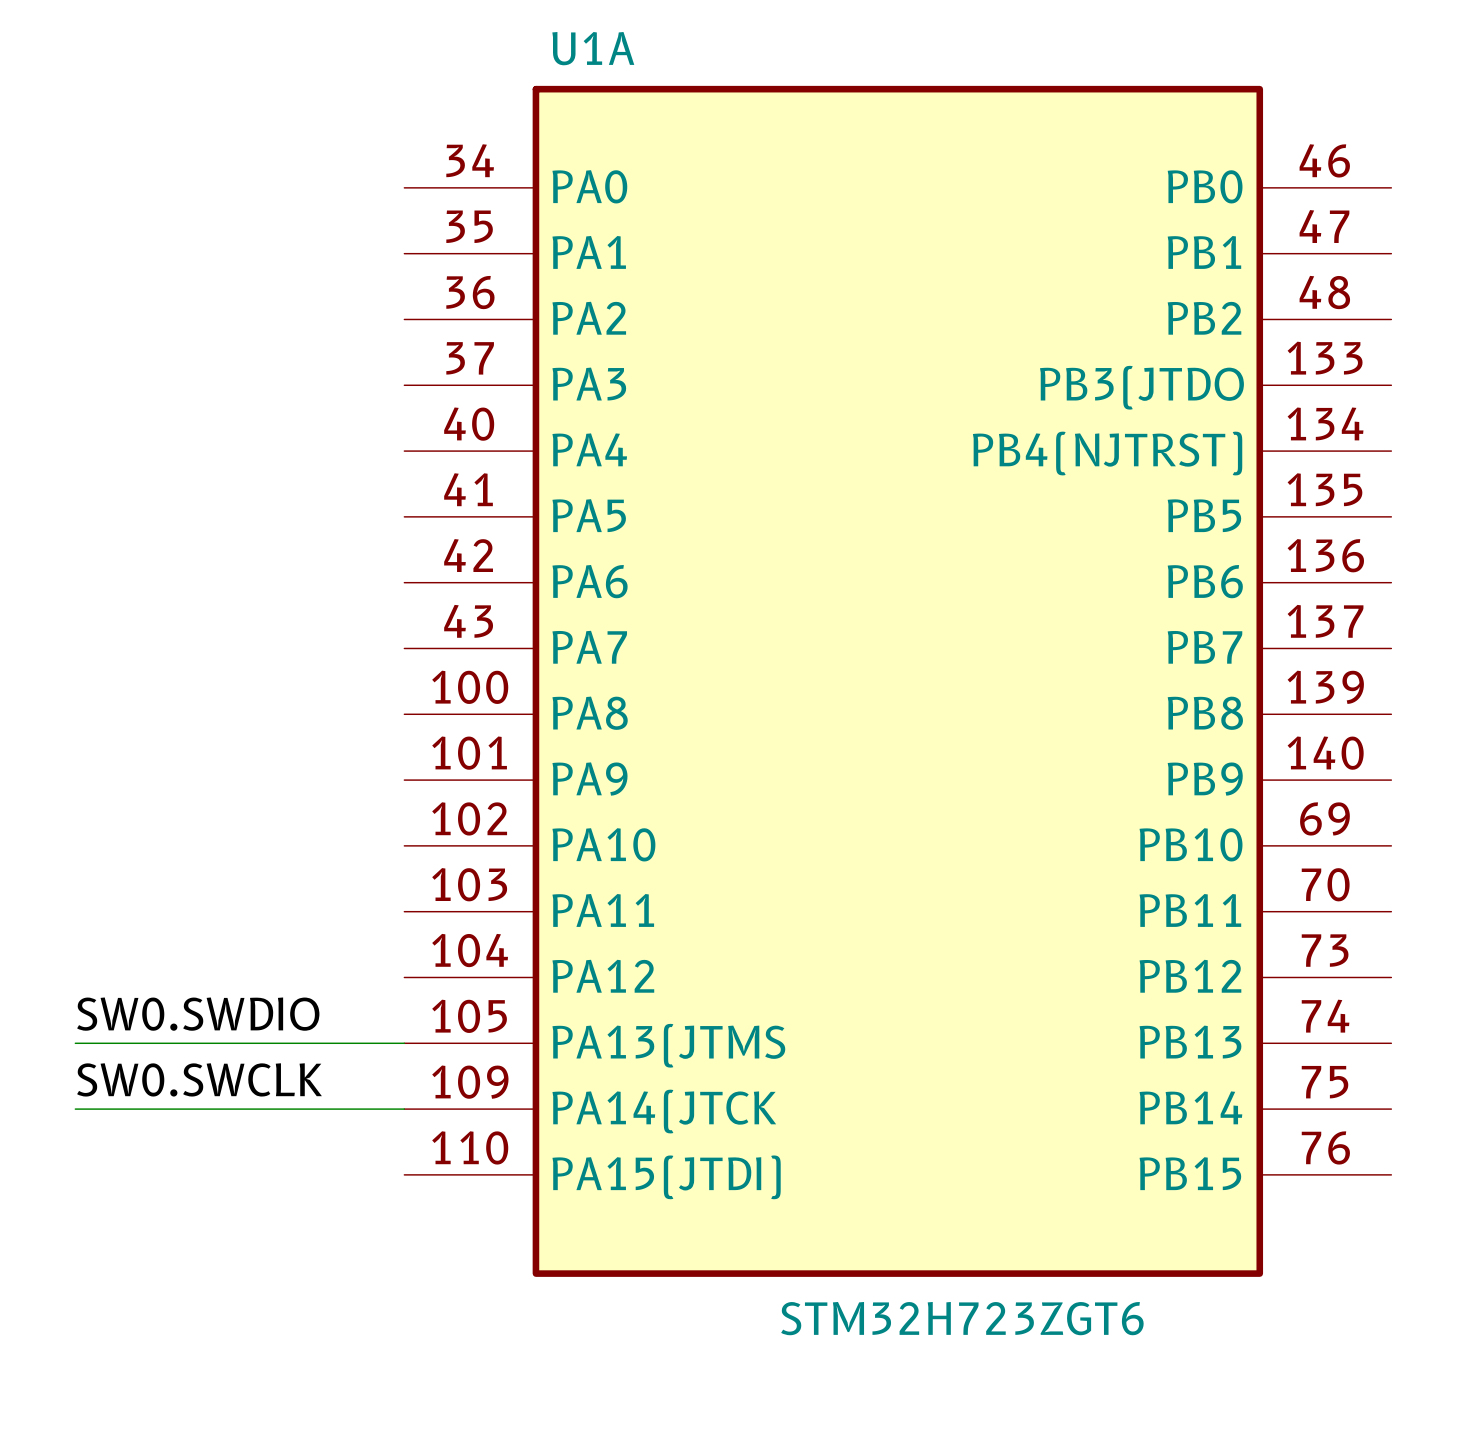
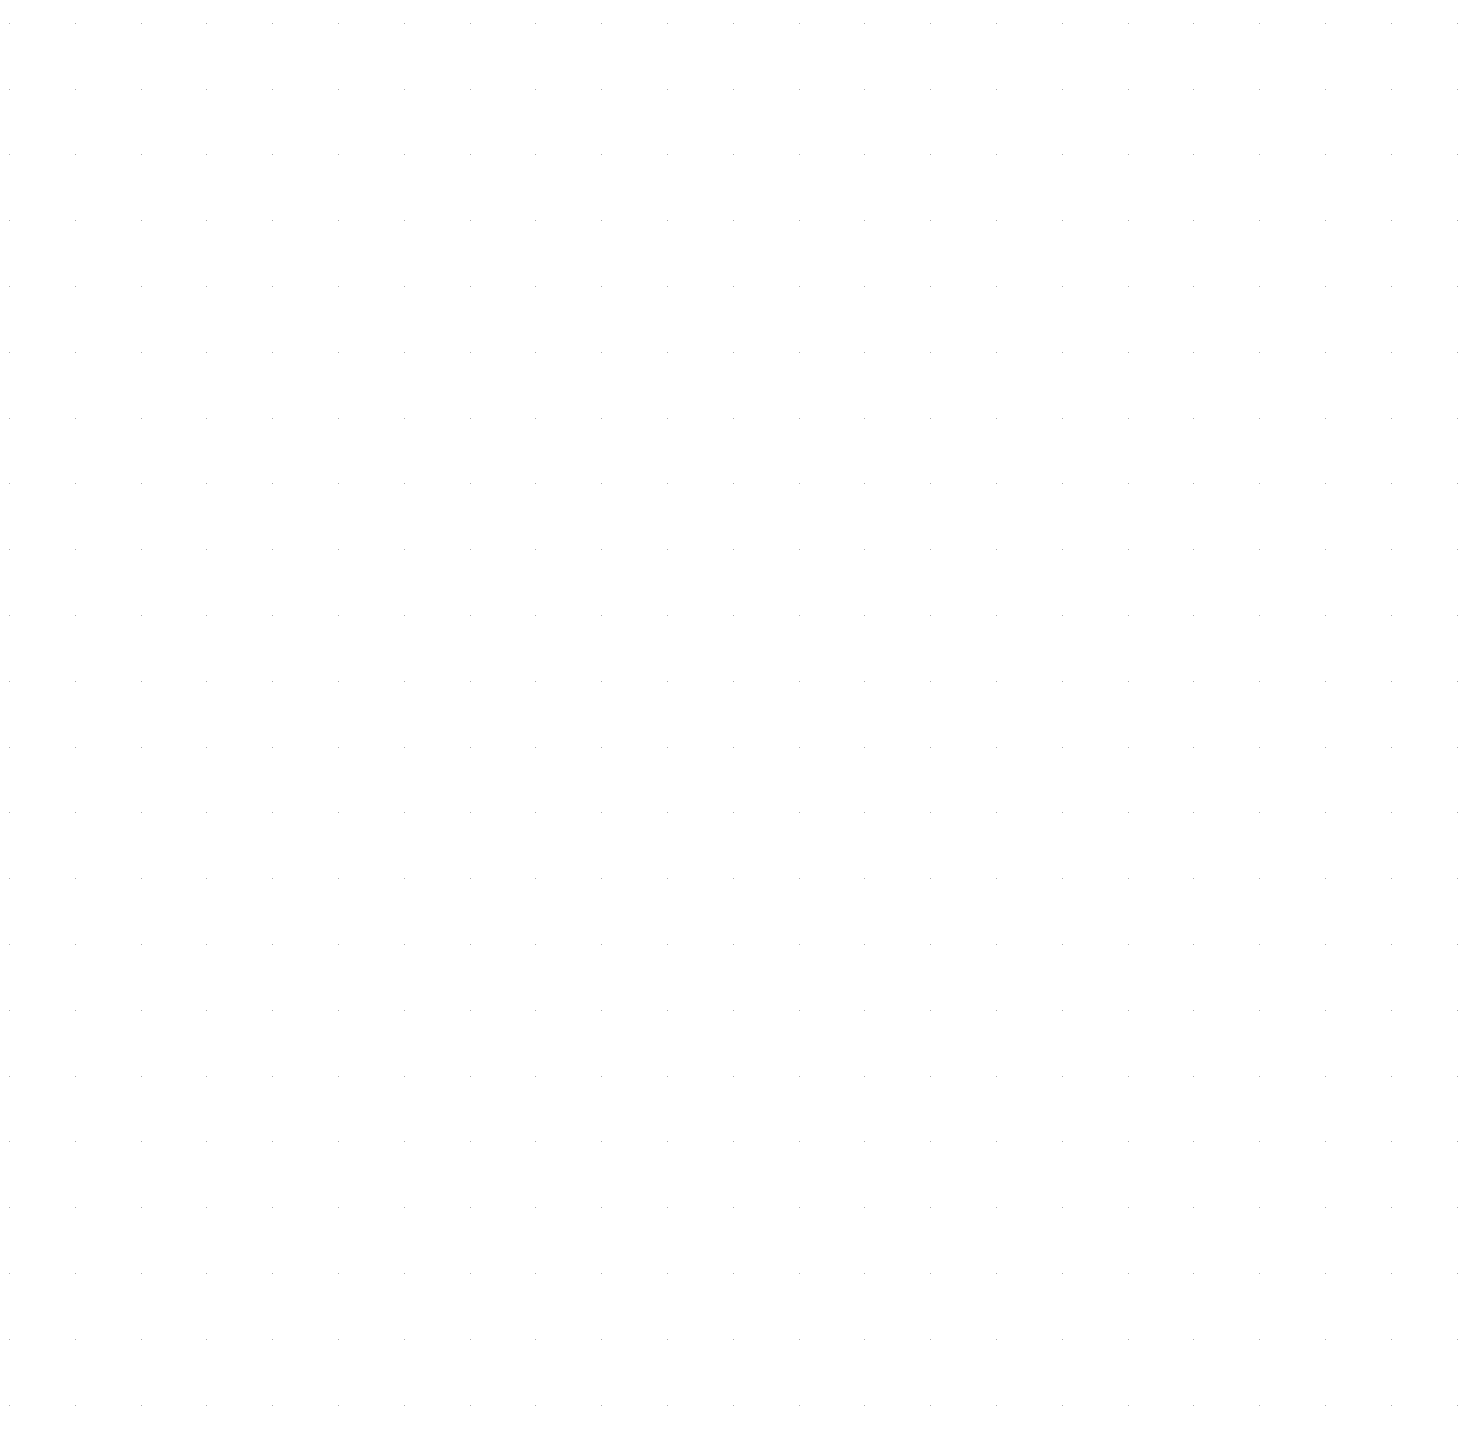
U1A: STM32H723ZGT6 (897, 681) -> none
label: SW0.SWDIO (198, 1014) -> none
wire: (75, 1043) (404, 1043) -> none
label: SW0.SWCLK (199, 1079) -> none
wire: (75, 1109) (404, 1109) -> none

